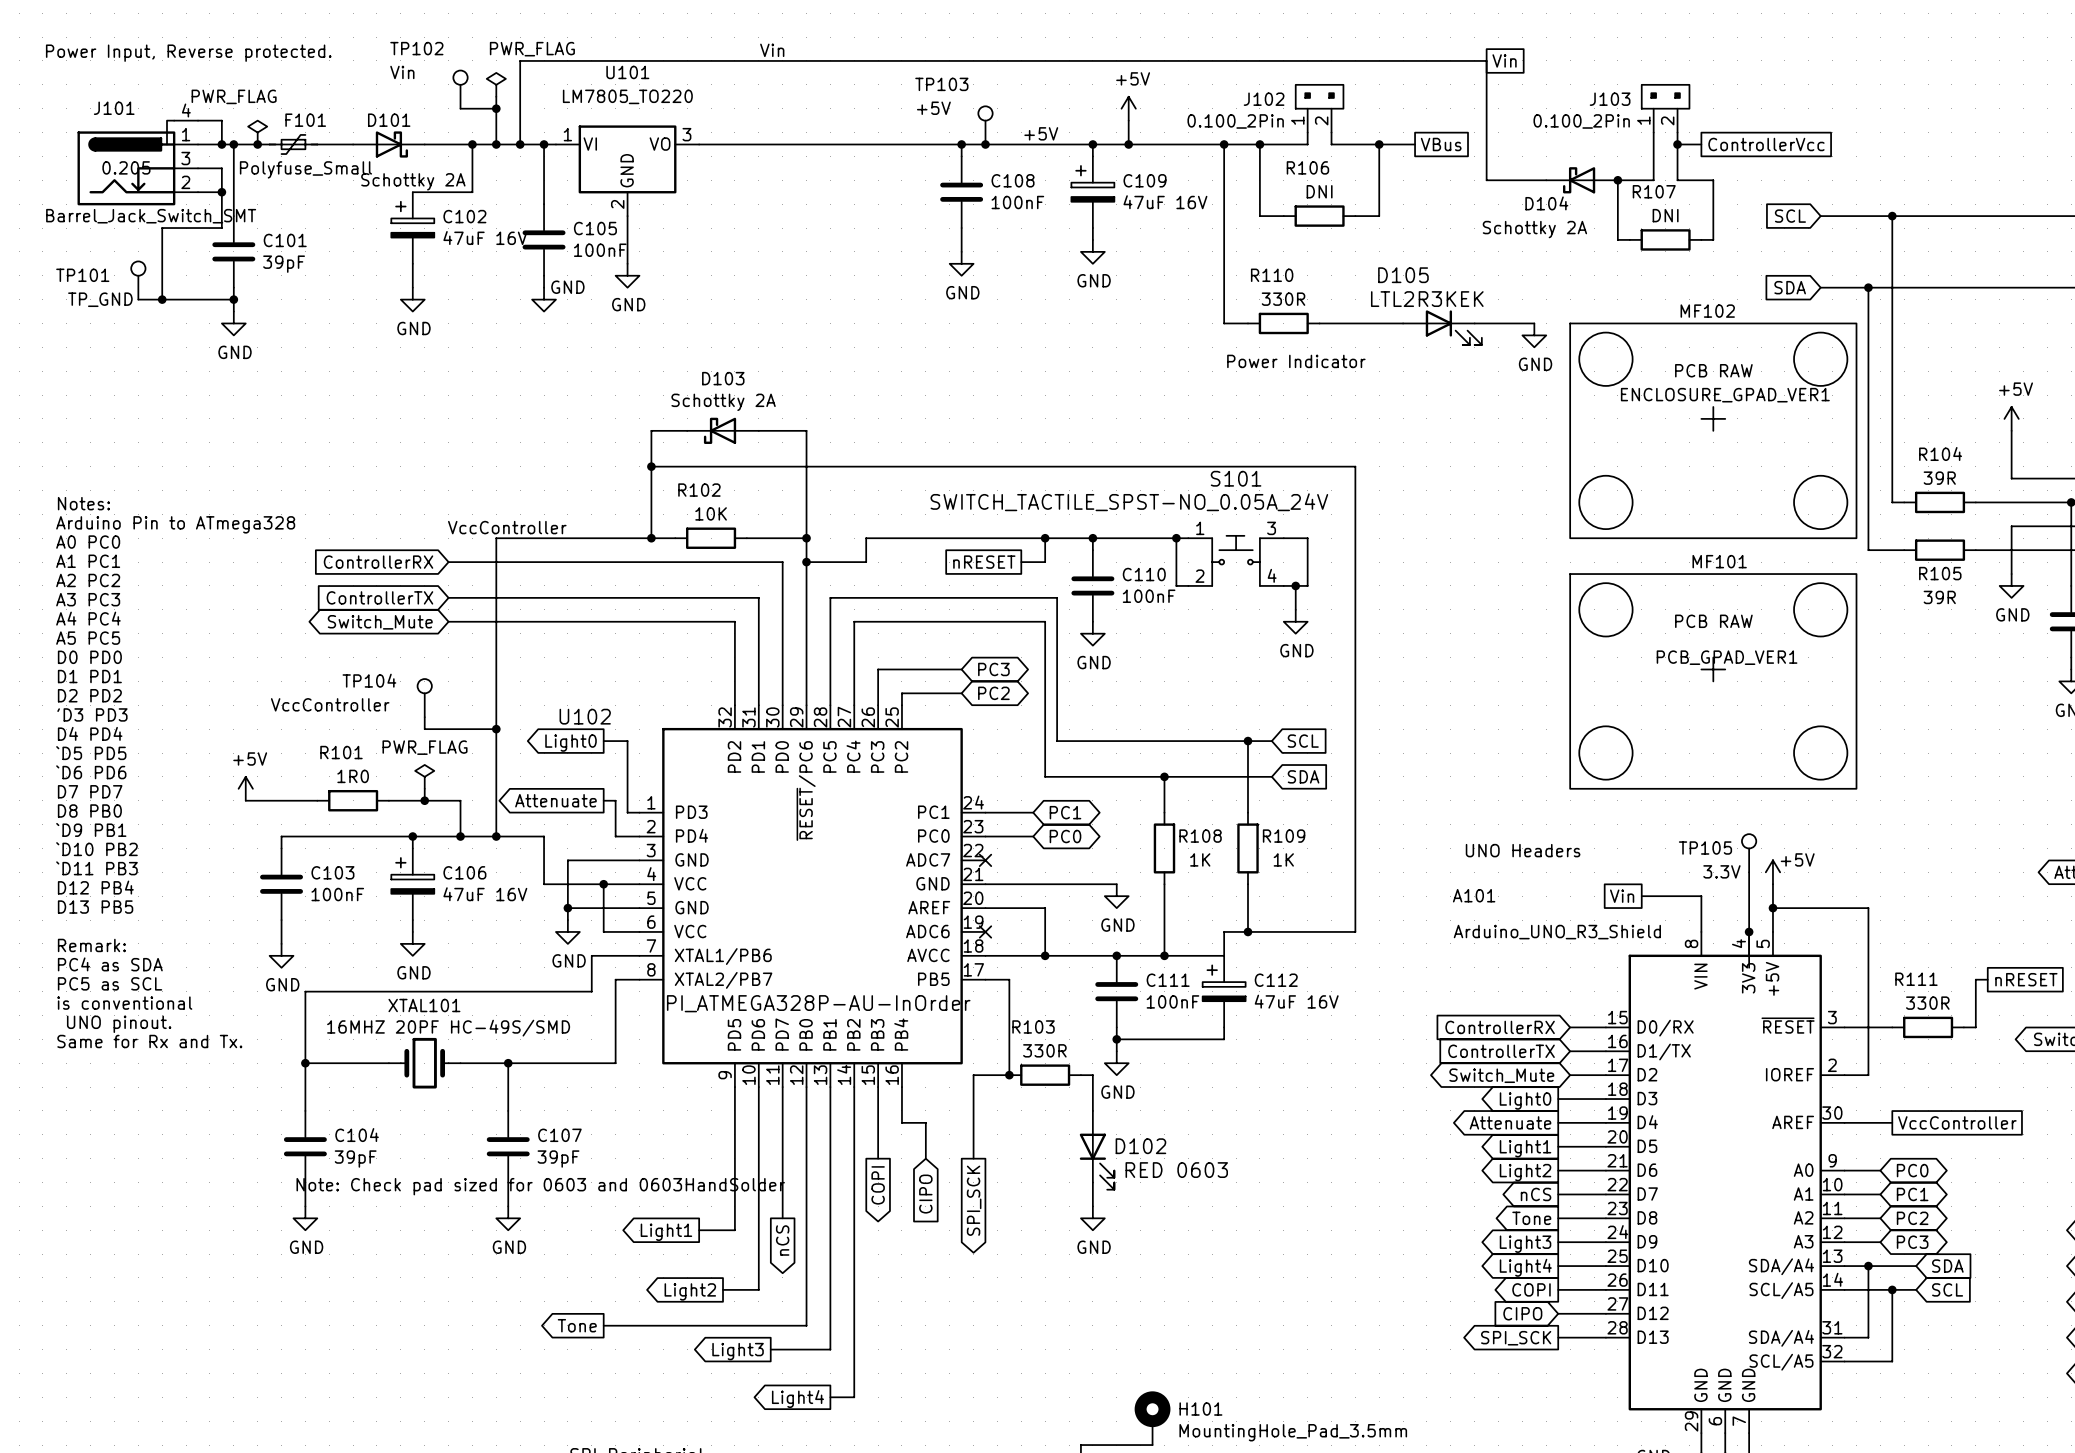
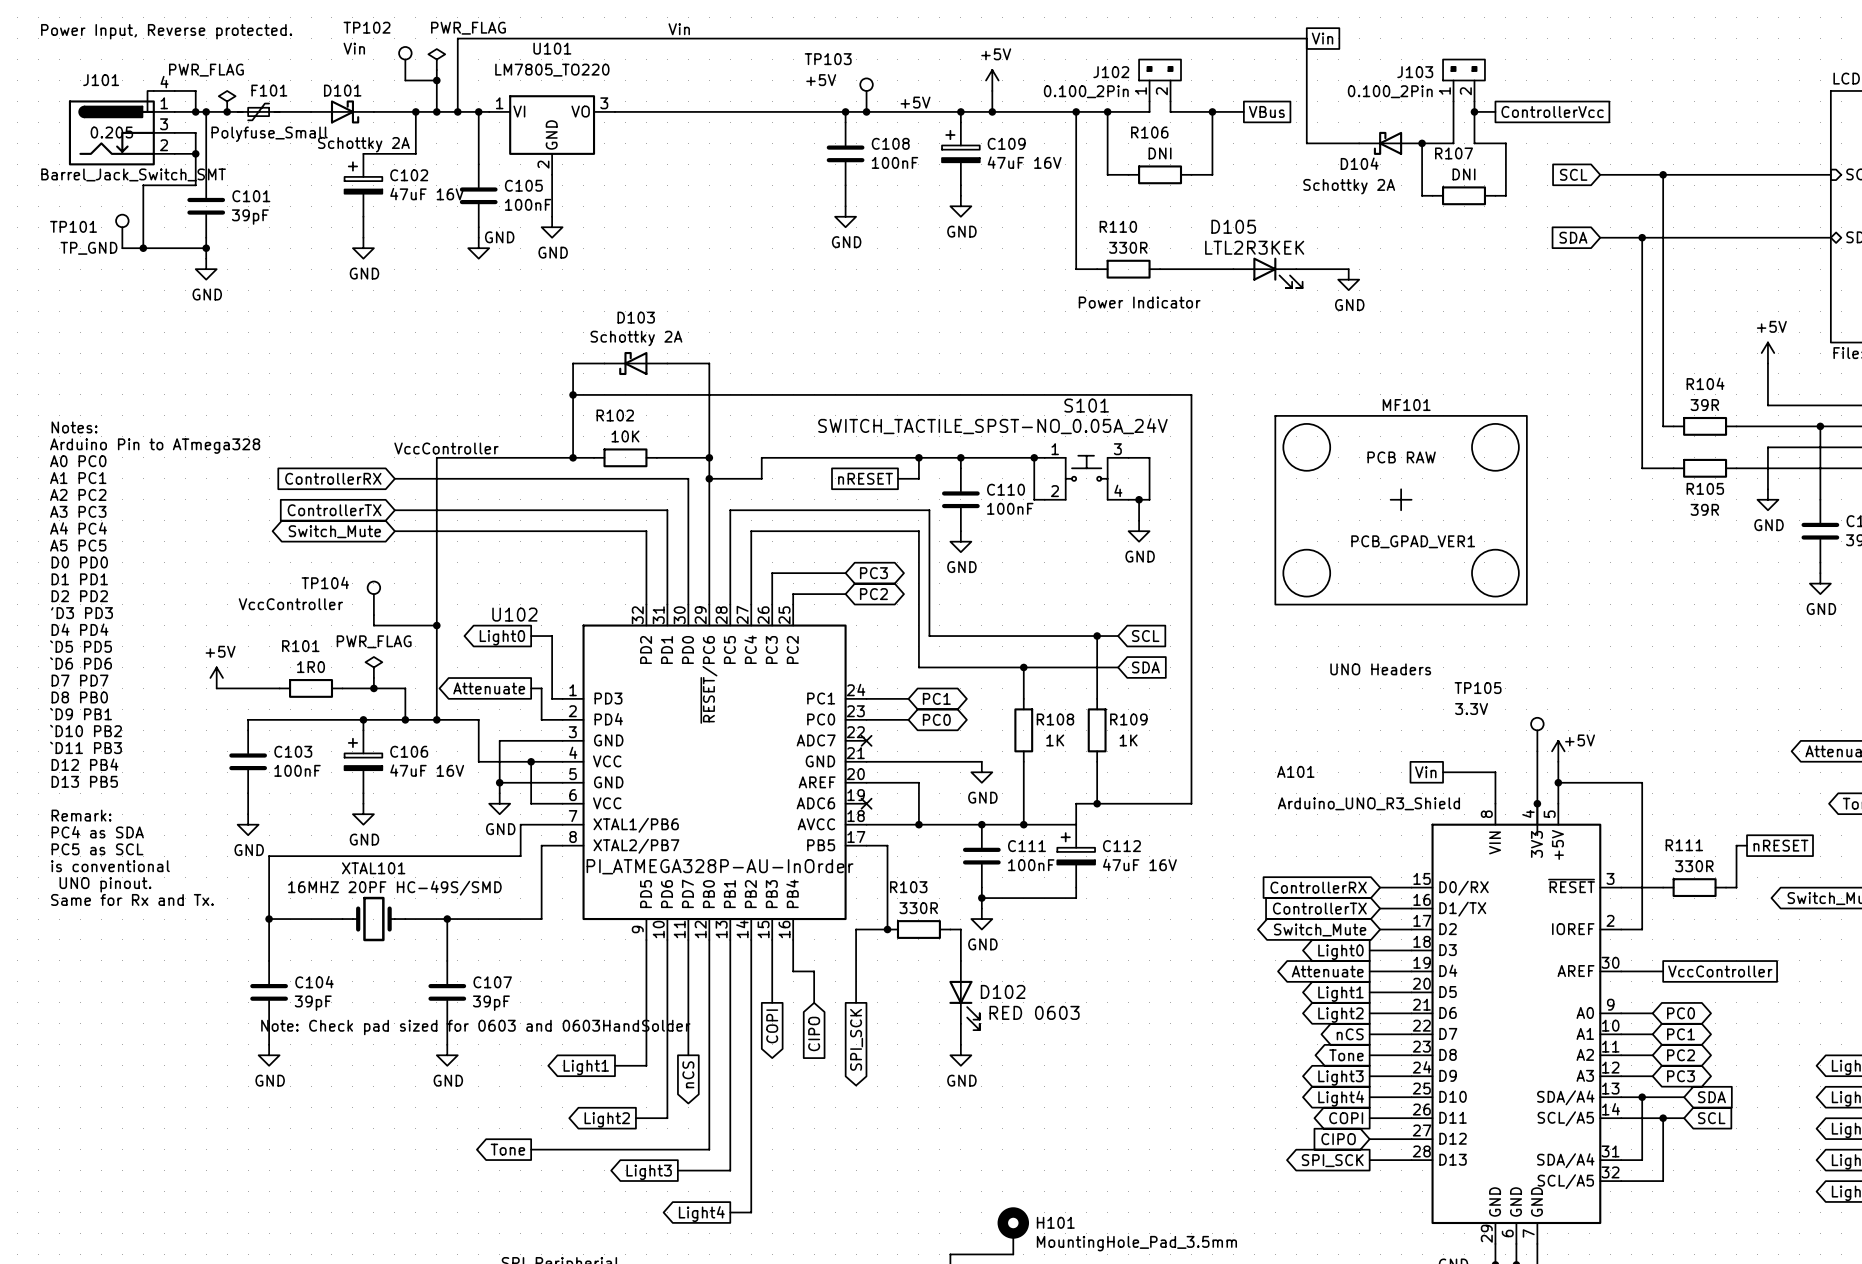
MF102: ENCLOSURE_GPAD_VER1 (1713, 430) -> none
MF101 value position: PCB_GPAD_VER1 (1727, 657) -> PCB_GPAD_VER1 (1413, 541)
MF101 position: (1713, 681) -> (1401, 510)
TP105 name position: TP105 (1705, 848) -> TP105 (1478, 688)
text position: UNO Headers (1523, 850) -> UNO Headers (1380, 669)
TP105 value position: 3.3V (1721, 871) -> 3.3V (1471, 709)

